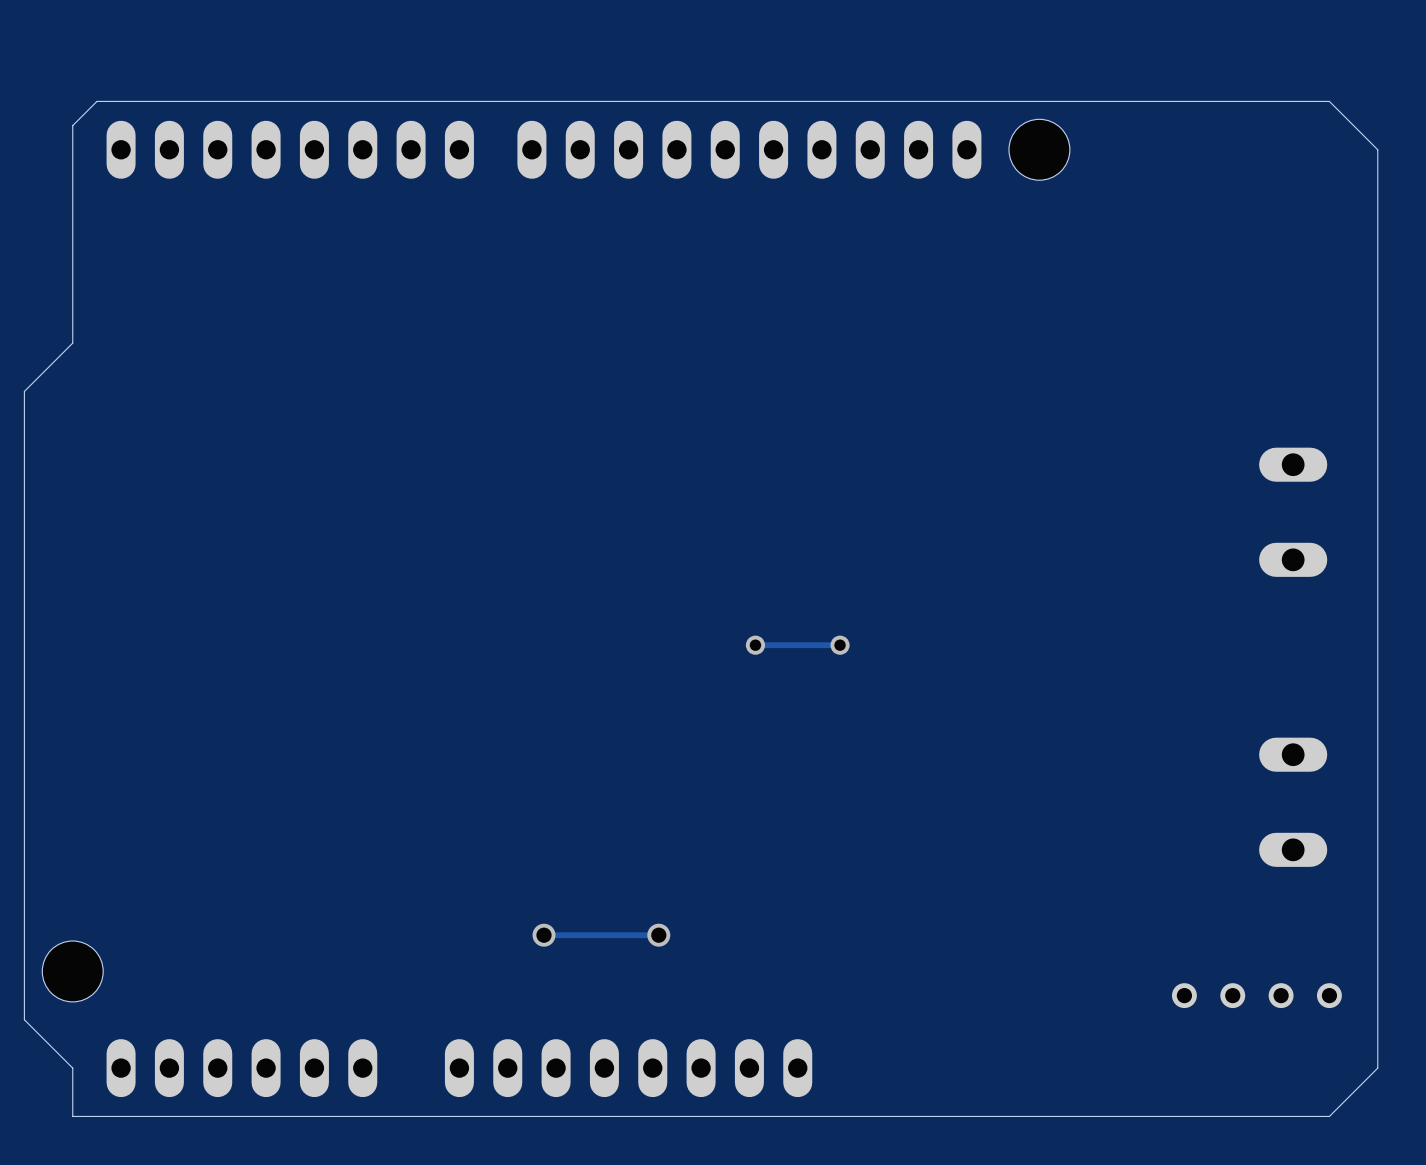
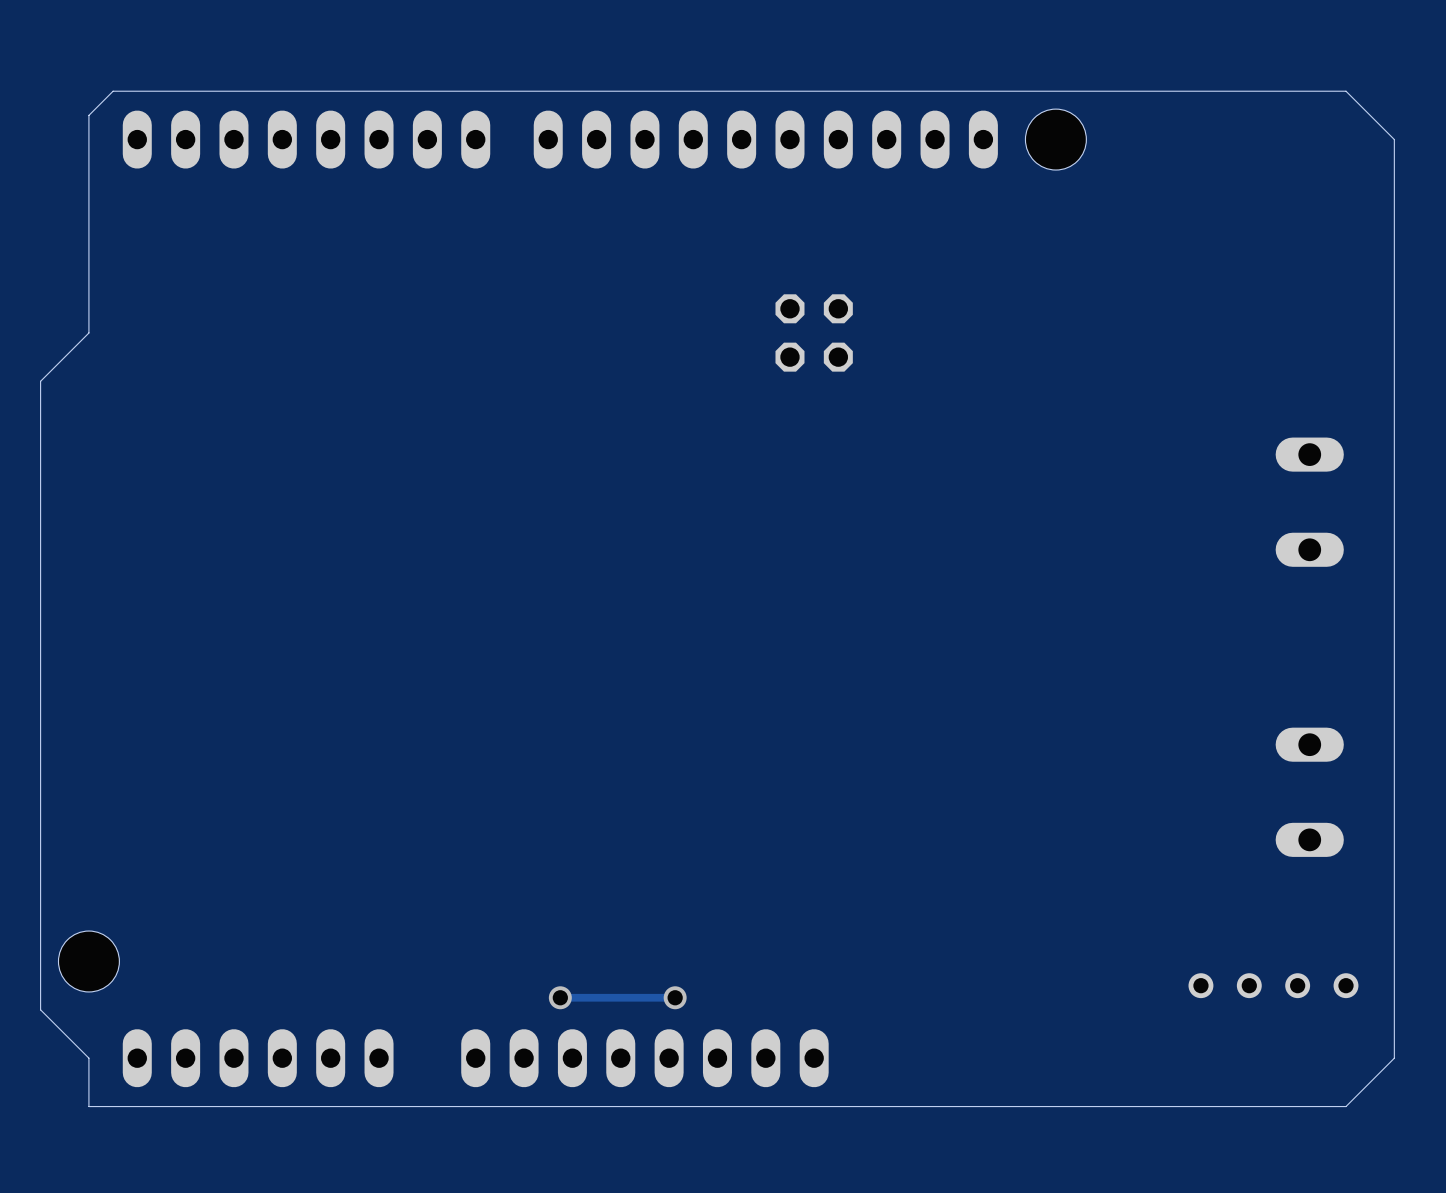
part: none -> (814, 332)
via: (755, 645) -> none
track: (840, 645) (755, 645) -> none
via: (840, 645) -> none
via: (544, 935) -> none
track: (658, 935) (544, 935) -> (675, 997) (560, 997)
via: (658, 935) -> none
via: none -> (560, 997)
via: none -> (675, 997)

